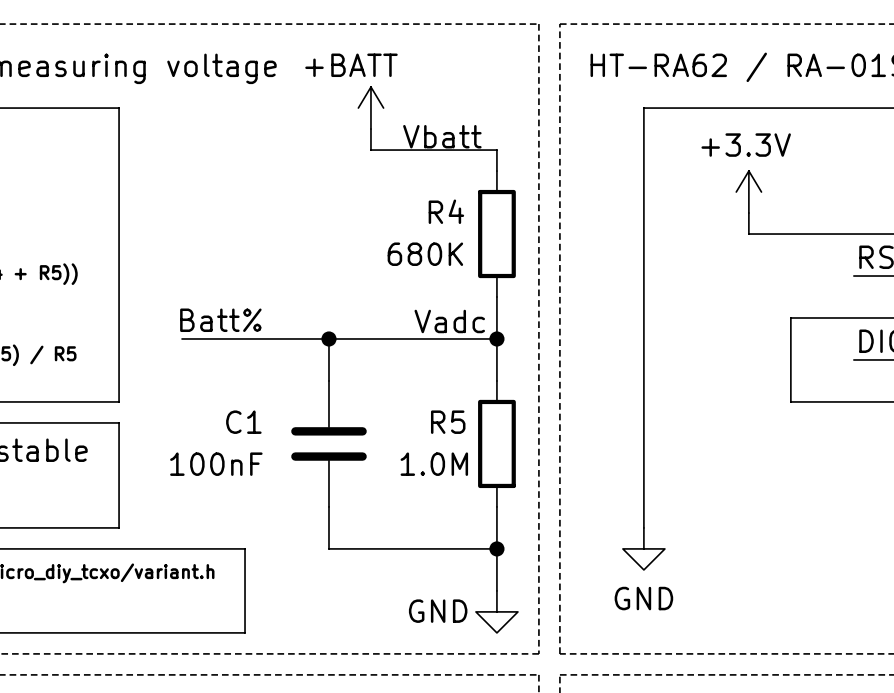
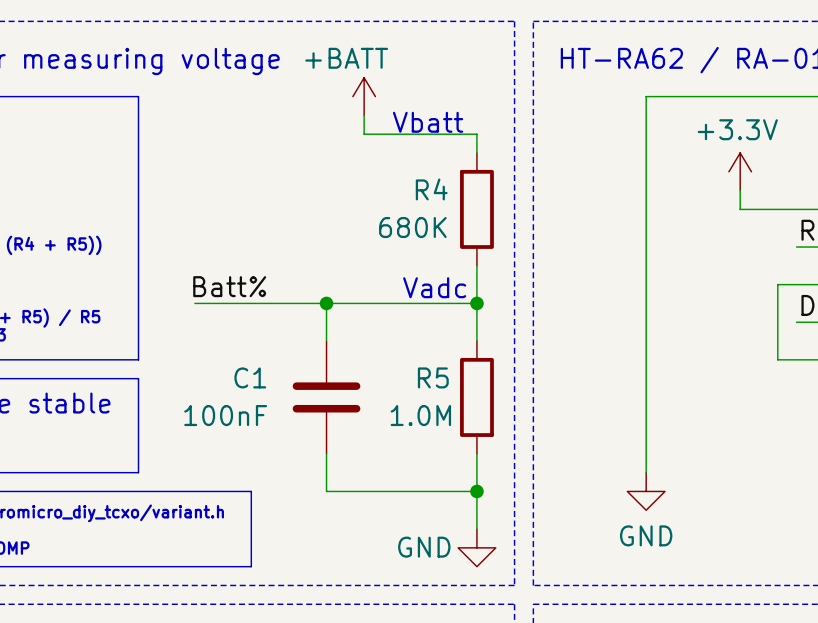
wire: (685, 108) (643, 108) (643, 527) -> (646, 96) (646, 472)
power symbol position: +3.3V (748, 192) -> +3.3V (740, 171)
wire: (748, 213) (748, 234) (790, 234) -> (740, 190) (740, 209)
wire: (832, 317) (790, 317) (790, 401) (832, 401) -> (777, 284) (777, 359)
power symbol position: GND (643, 548) -> GND (646, 491)

